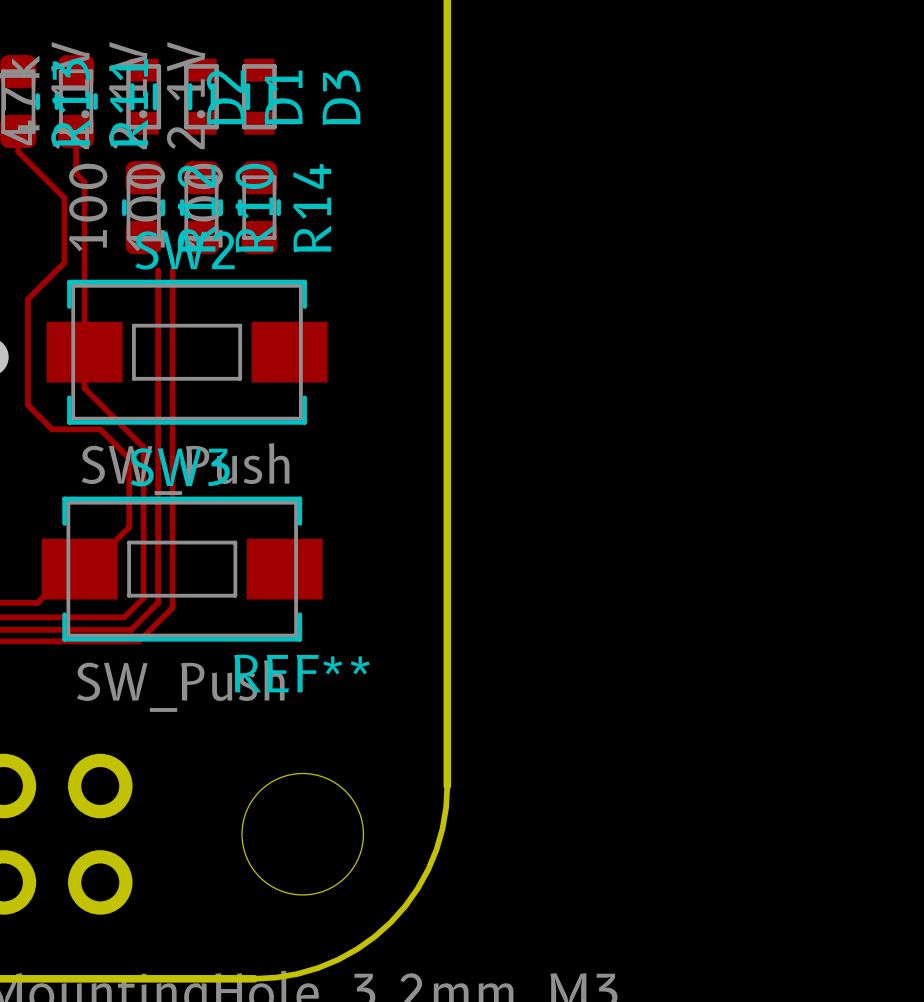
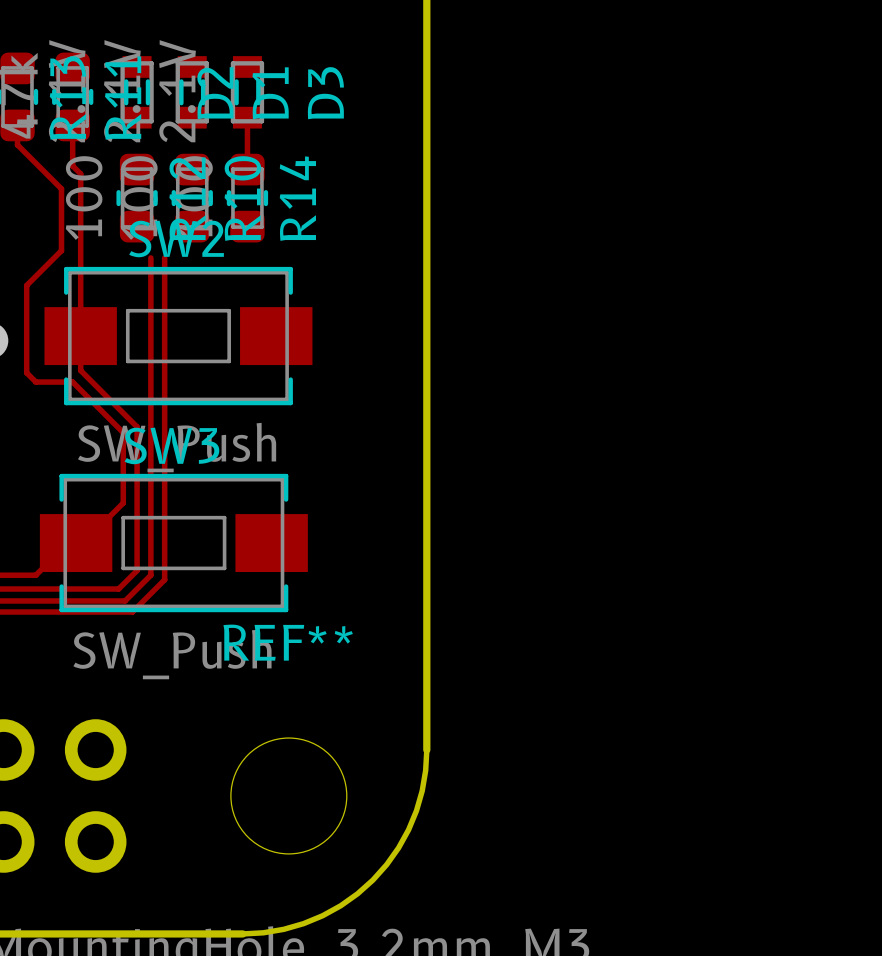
track: none -> (247, 117) (247, 169)
track: (27, 390) (27, 405) (52, 429) (100, 429) (129, 458) -> (26, 372) (35, 382) (72, 382) (123, 432) (123, 437)

